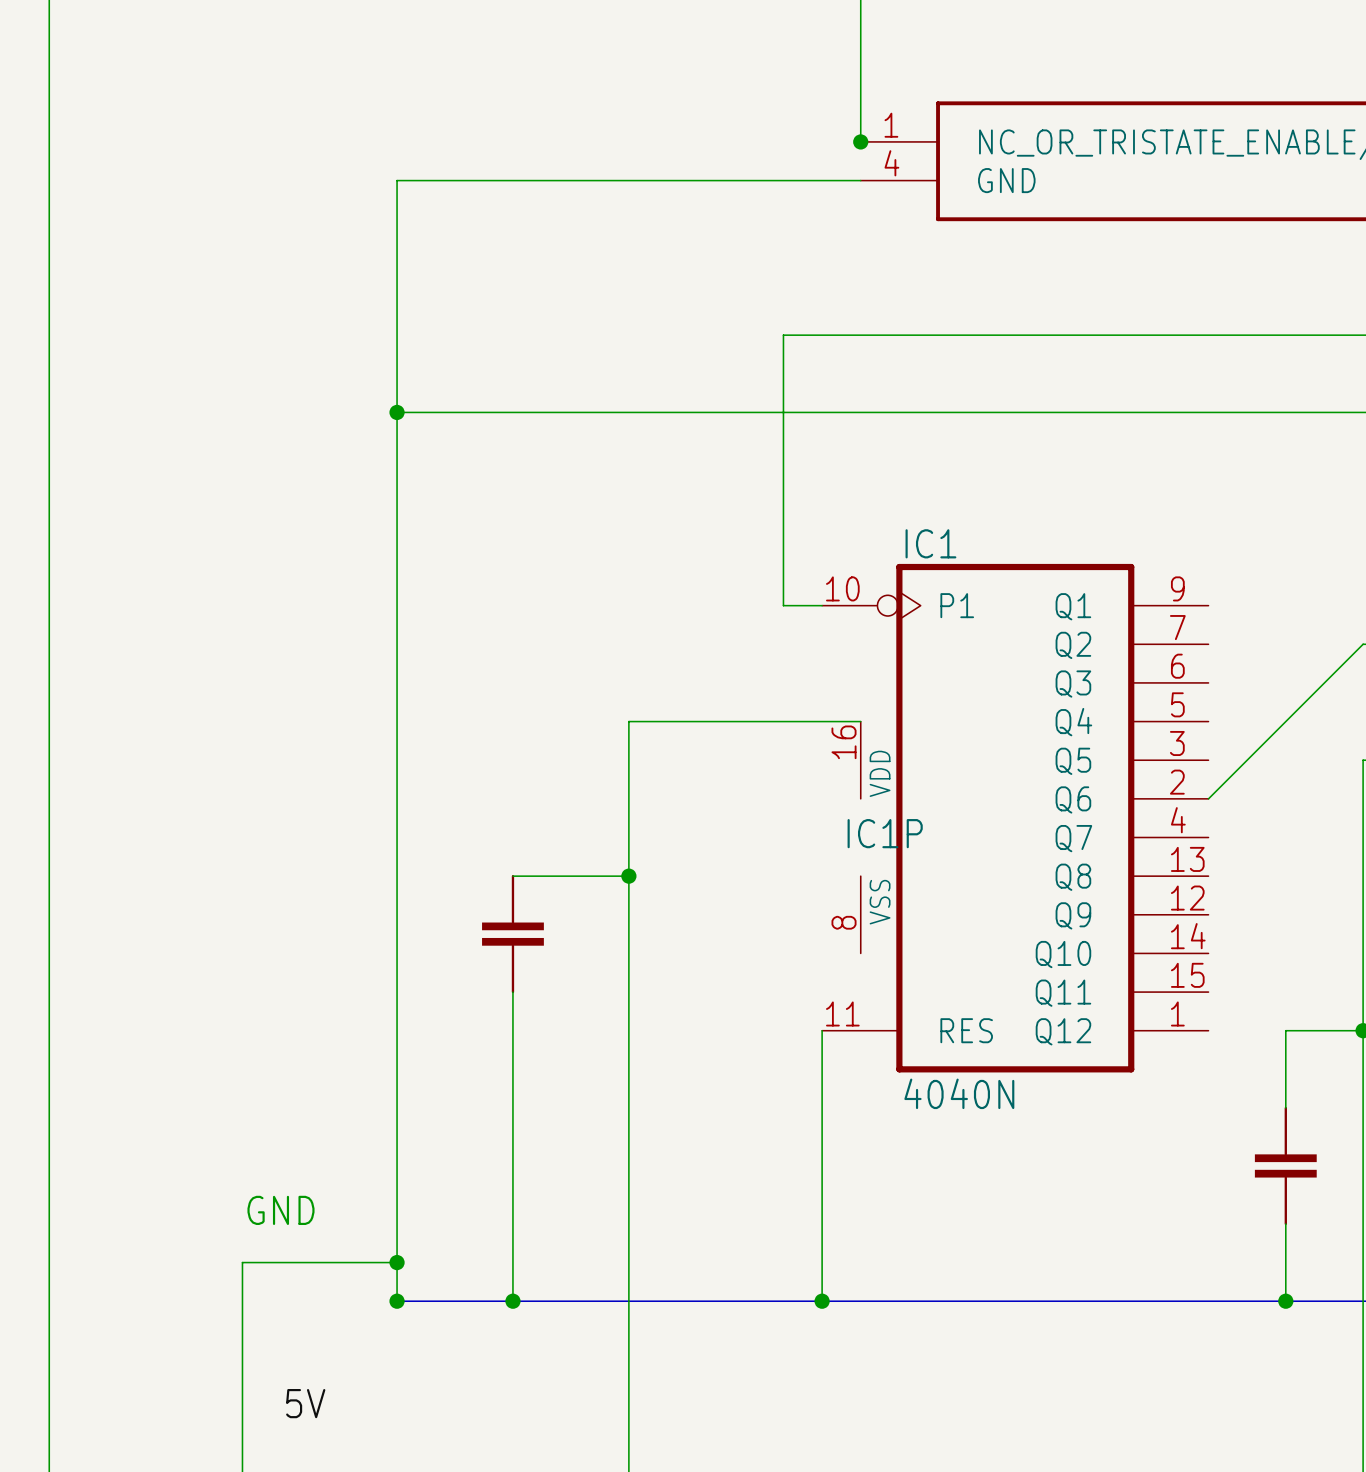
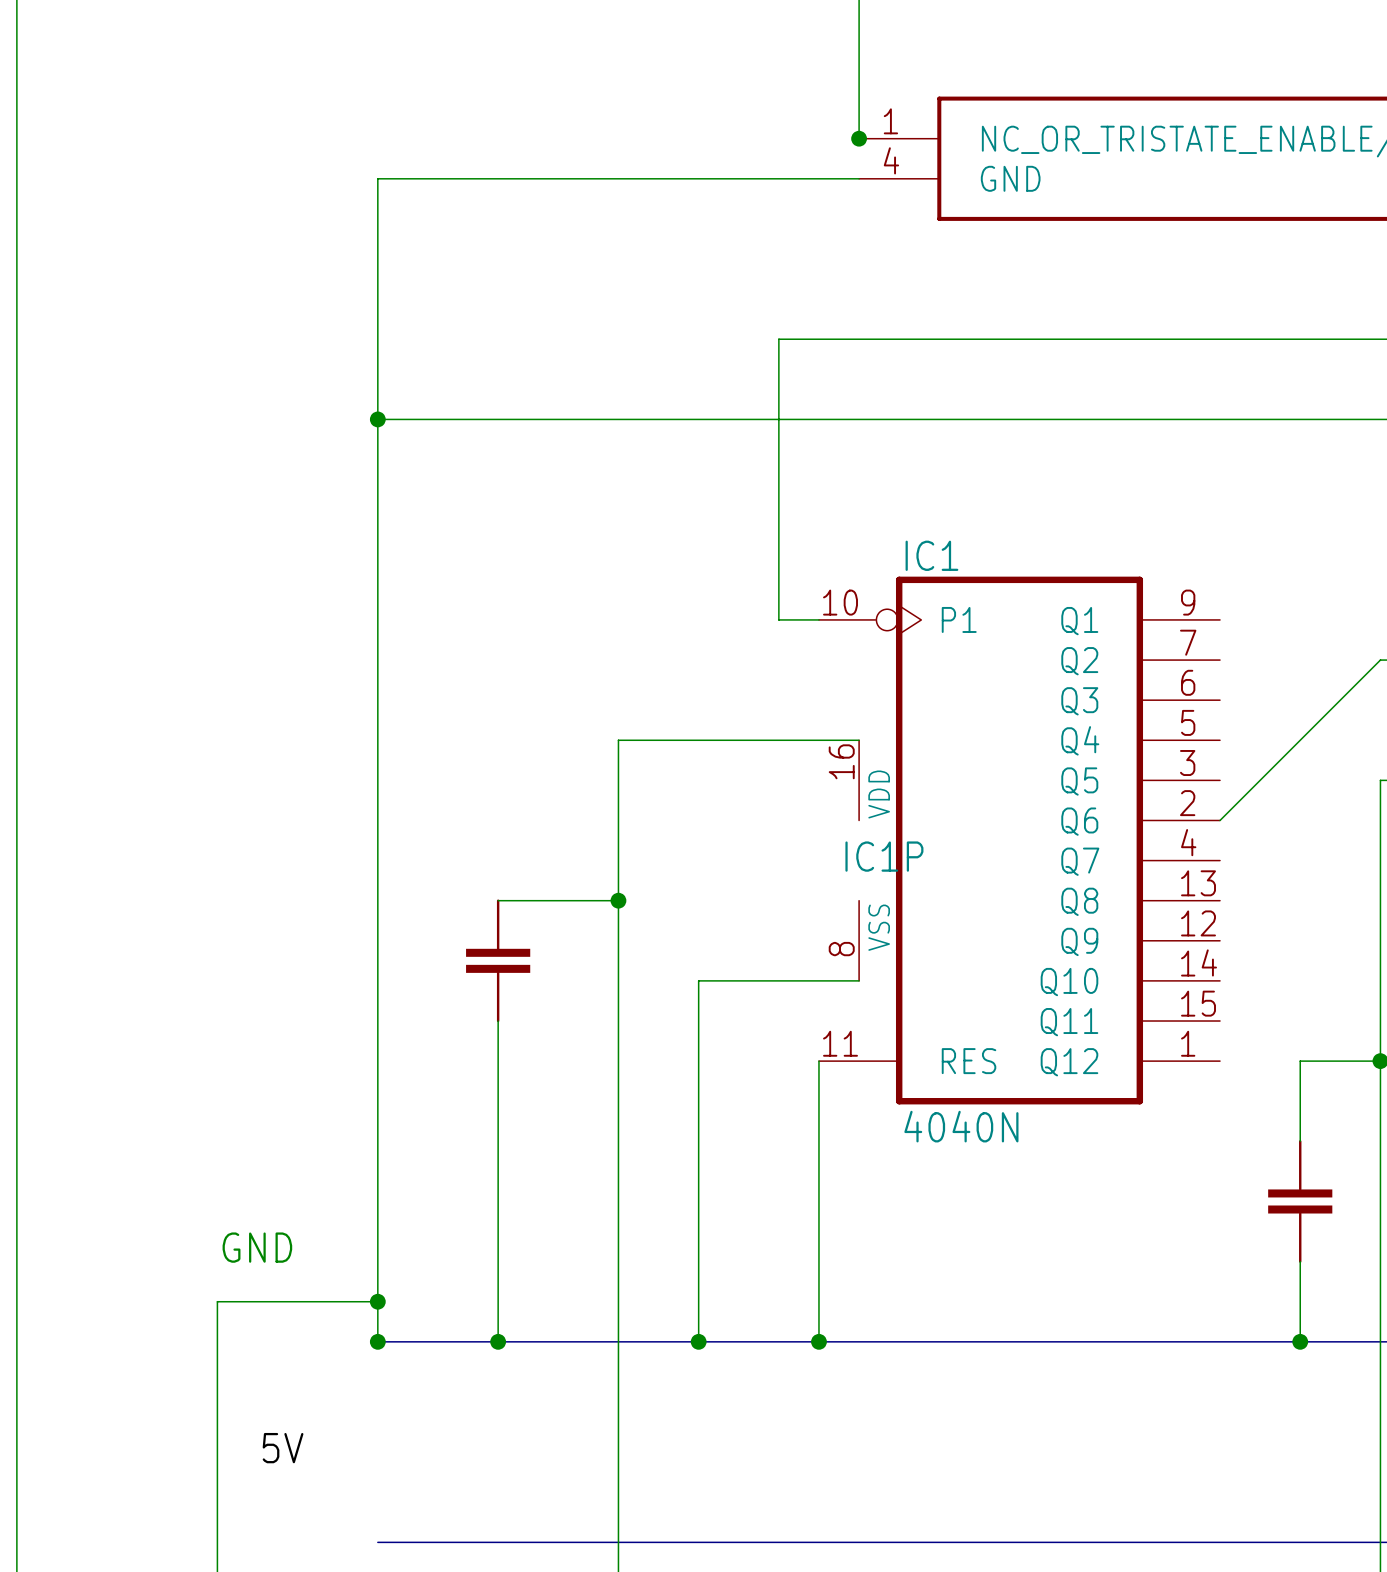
wire: none -> (859, 980) (698, 980) (698, 1341)
junction: none -> (698, 1341)

